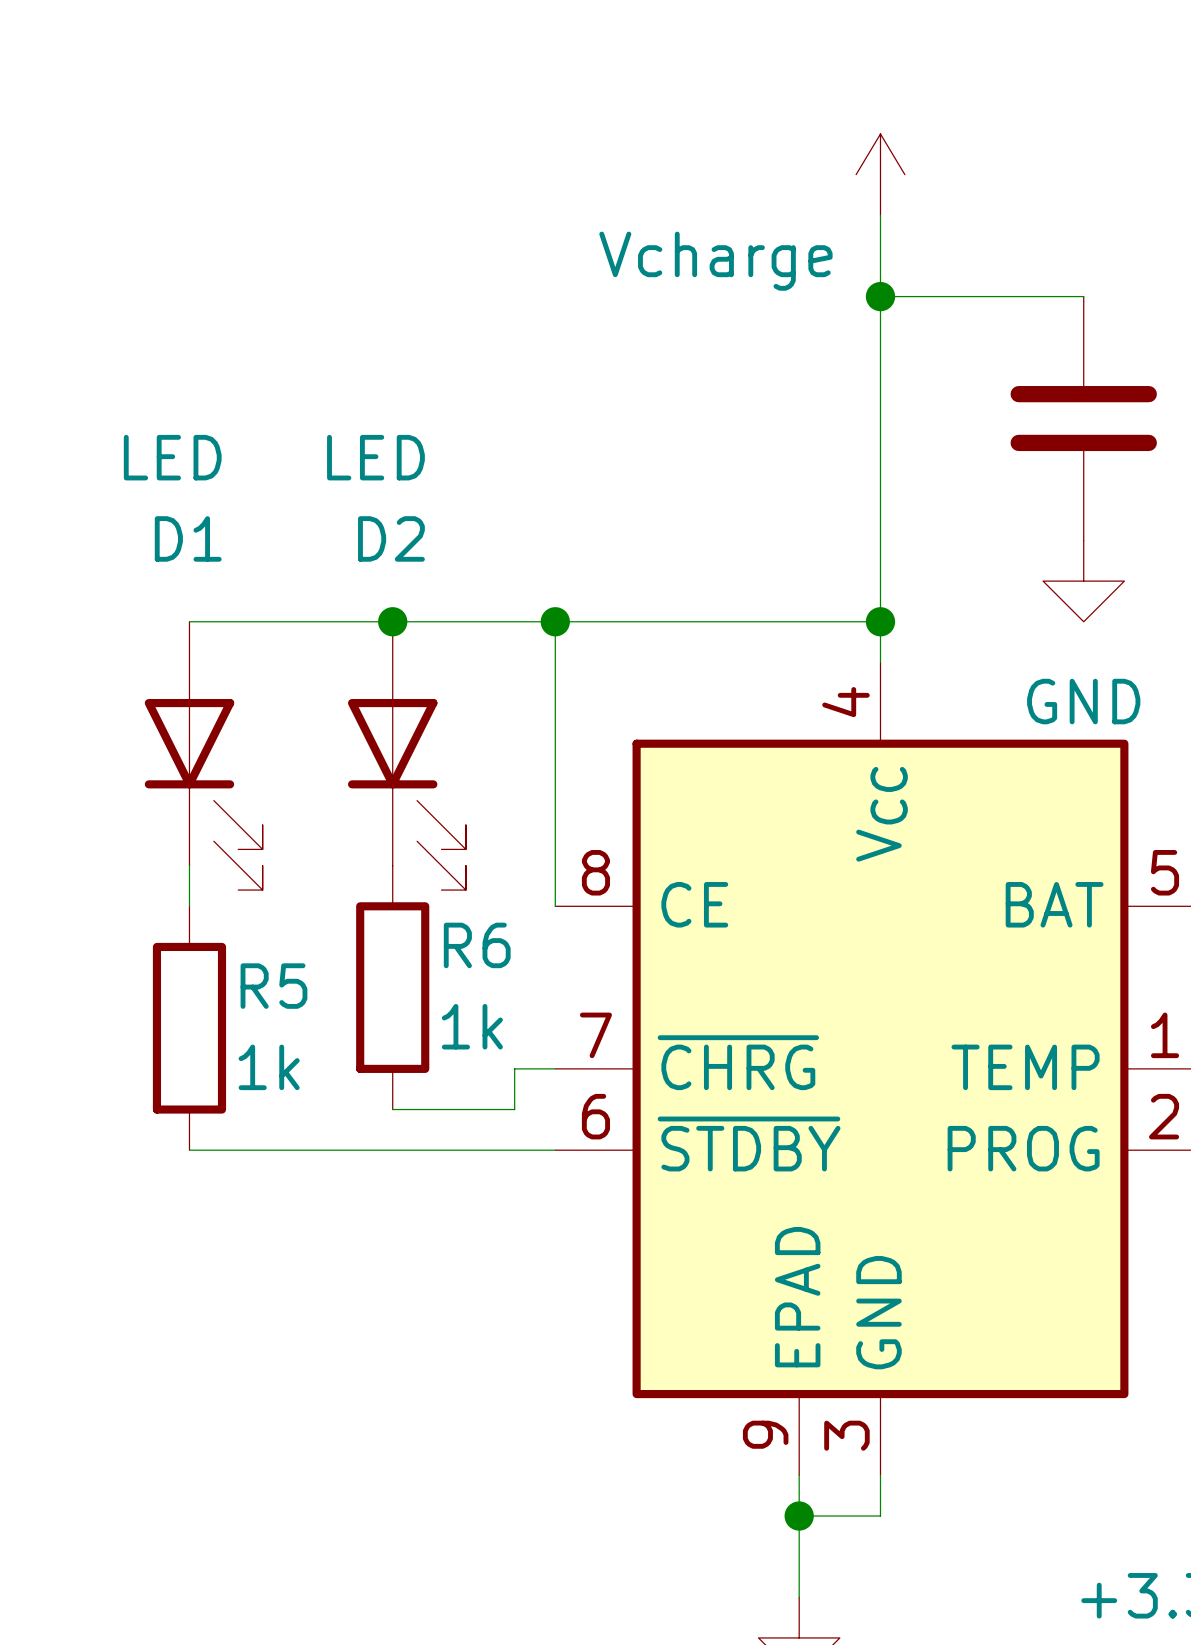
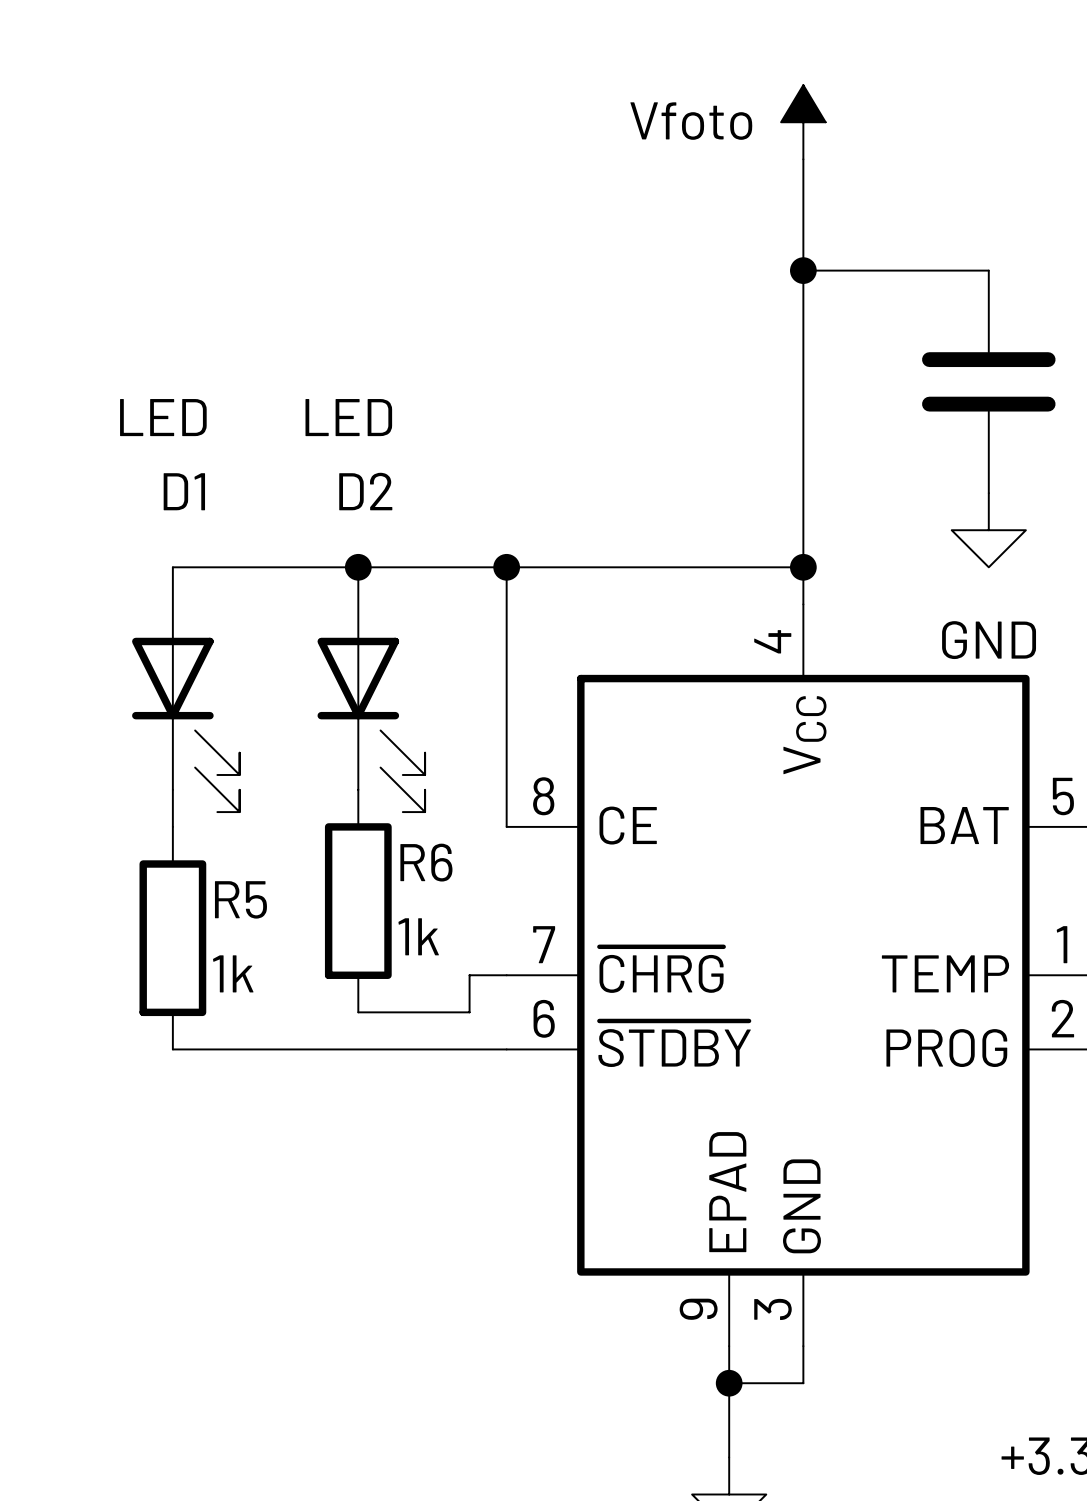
power symbol: none -> Vfoto (803, 122)
power symbol: Vcharge (880, 174) -> none

